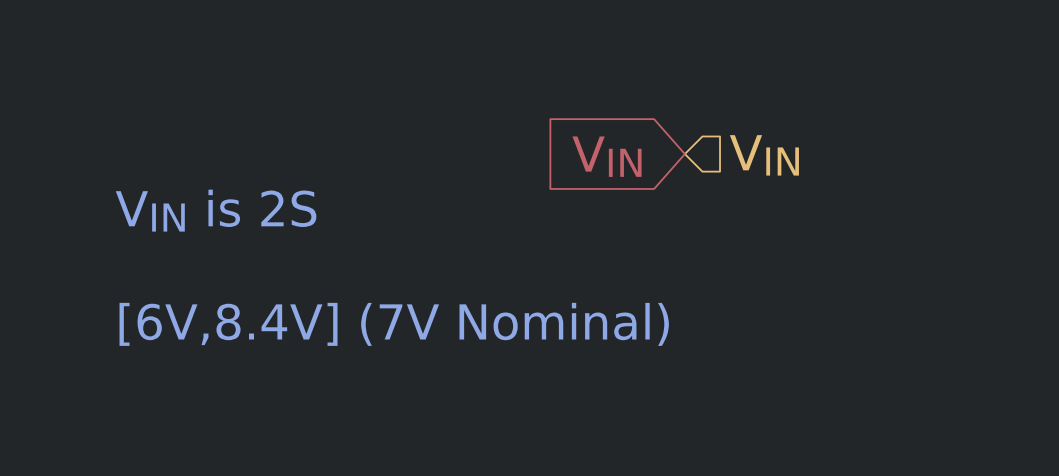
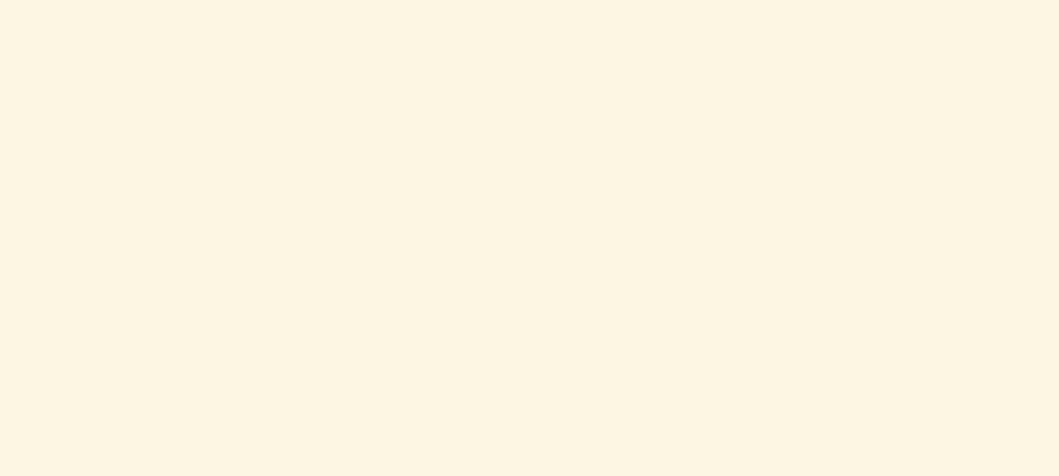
hierarchical label: VIN (764, 155) -> none
global label: VIN (607, 156) -> none
text: VIN is 2S (216, 210) -> none
text: [6V,8.4V] (7V Nominal) (394, 324) -> none

